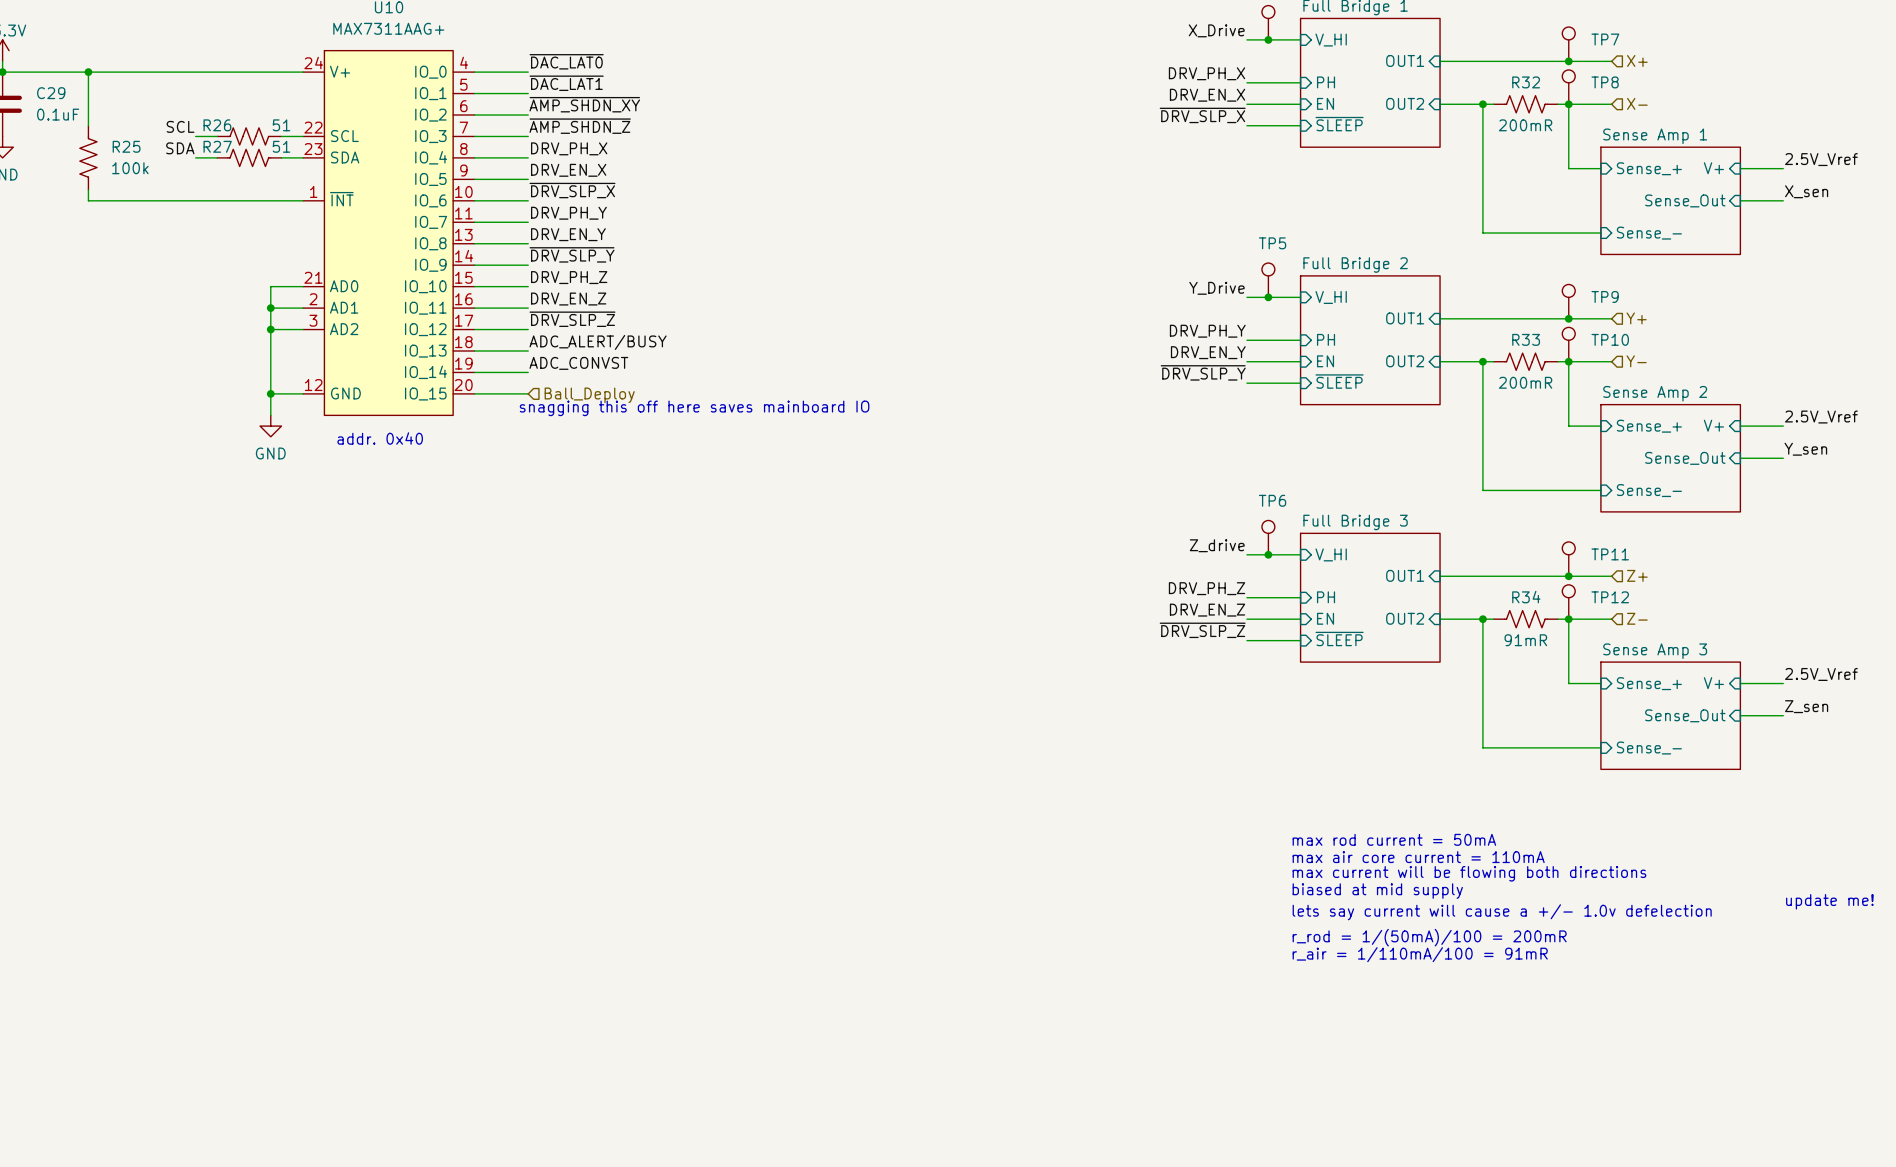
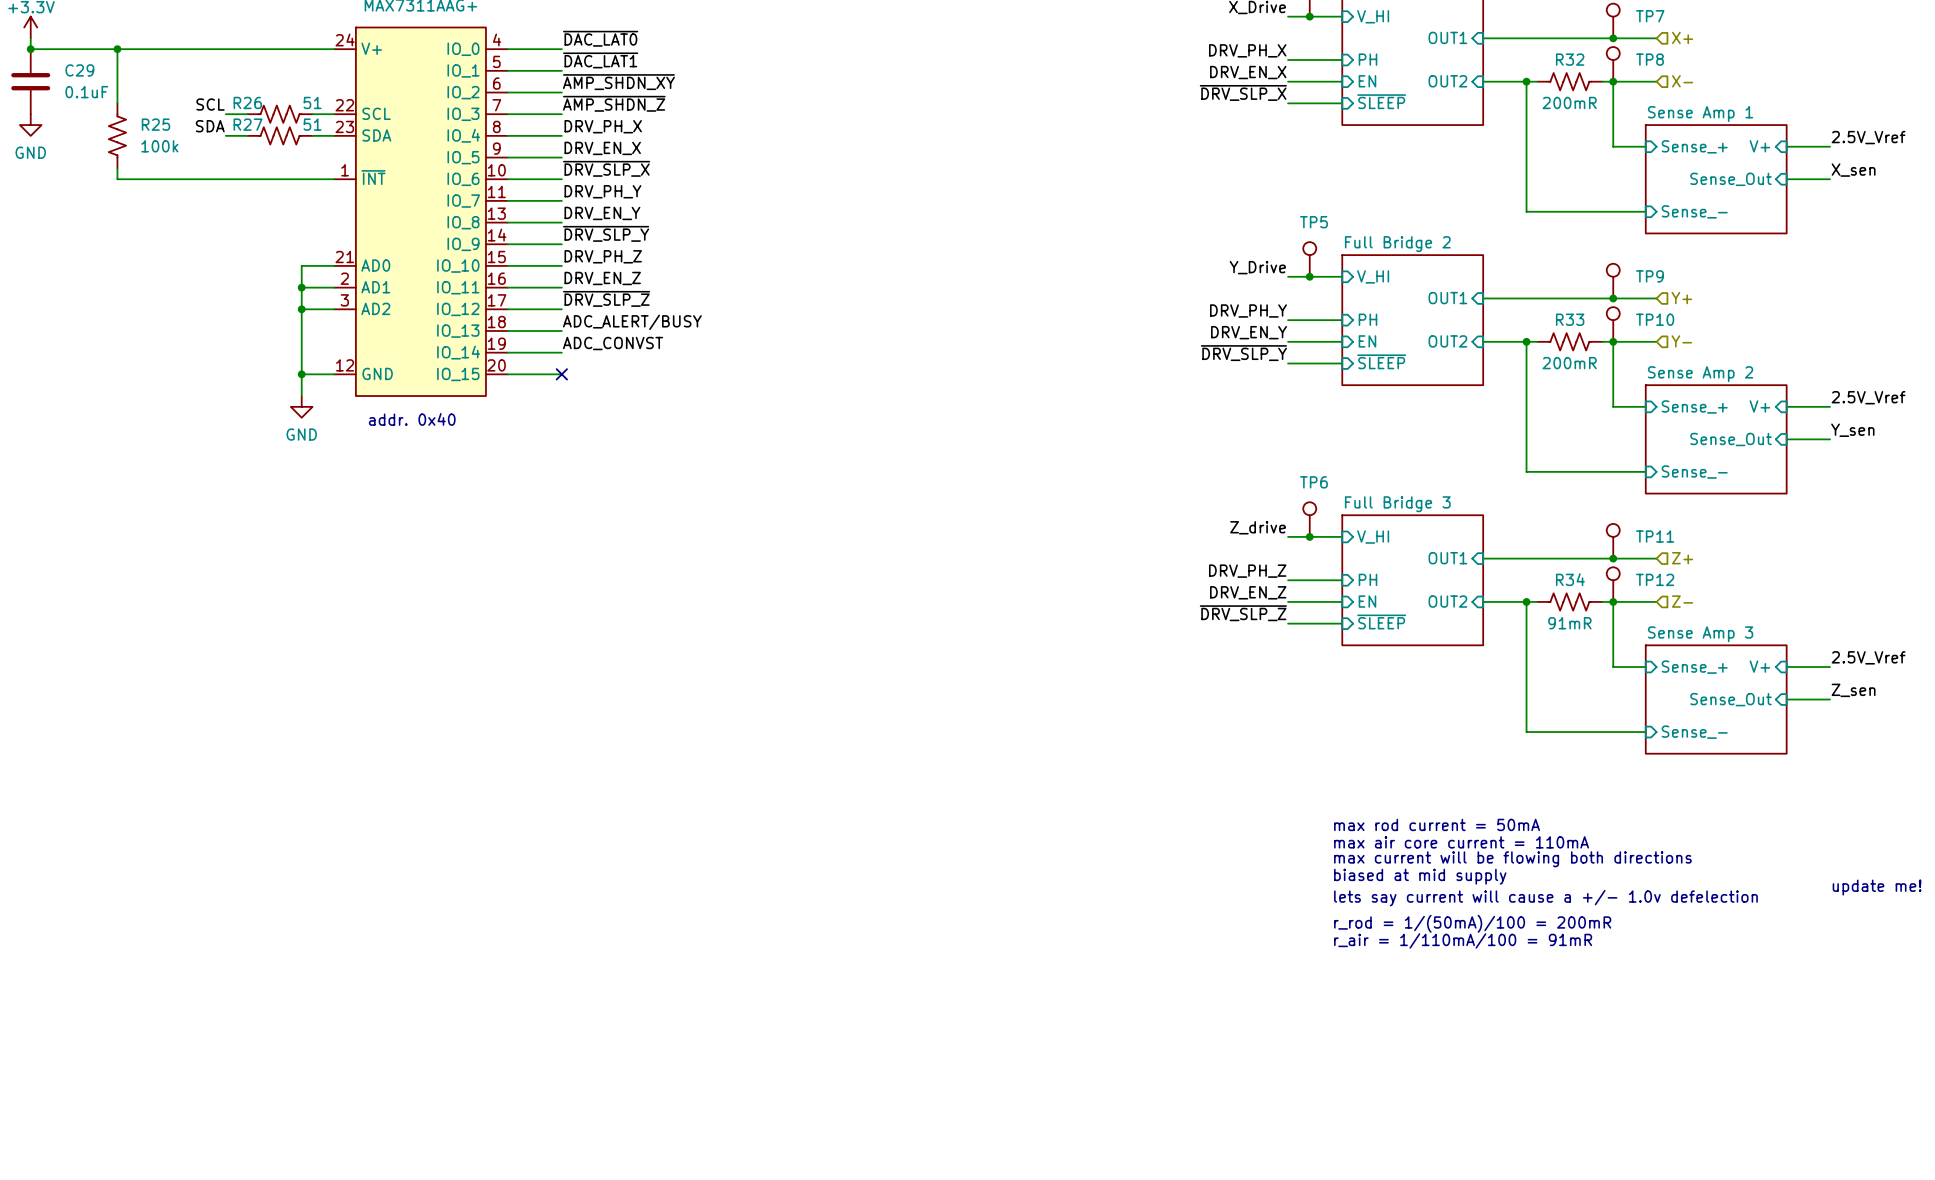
no-connect mark: none -> (561, 374)
hierarchical label: Ball_Deploy (589, 395) -> none
text: snagging this off here saves mainboard IO (694, 408) -> none

